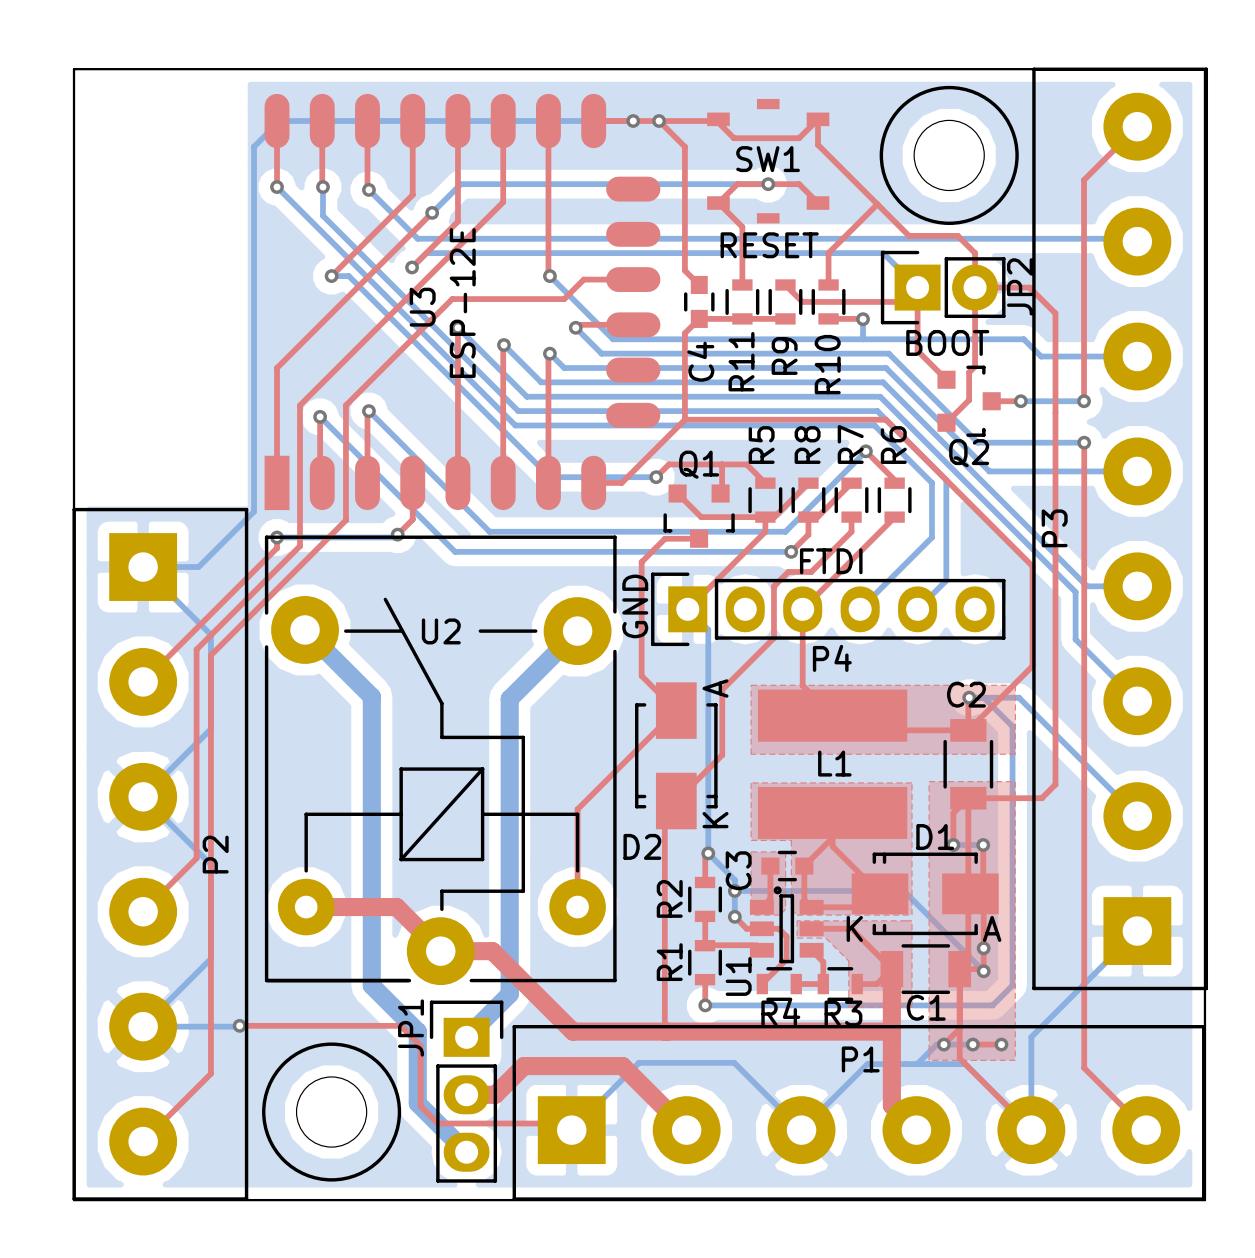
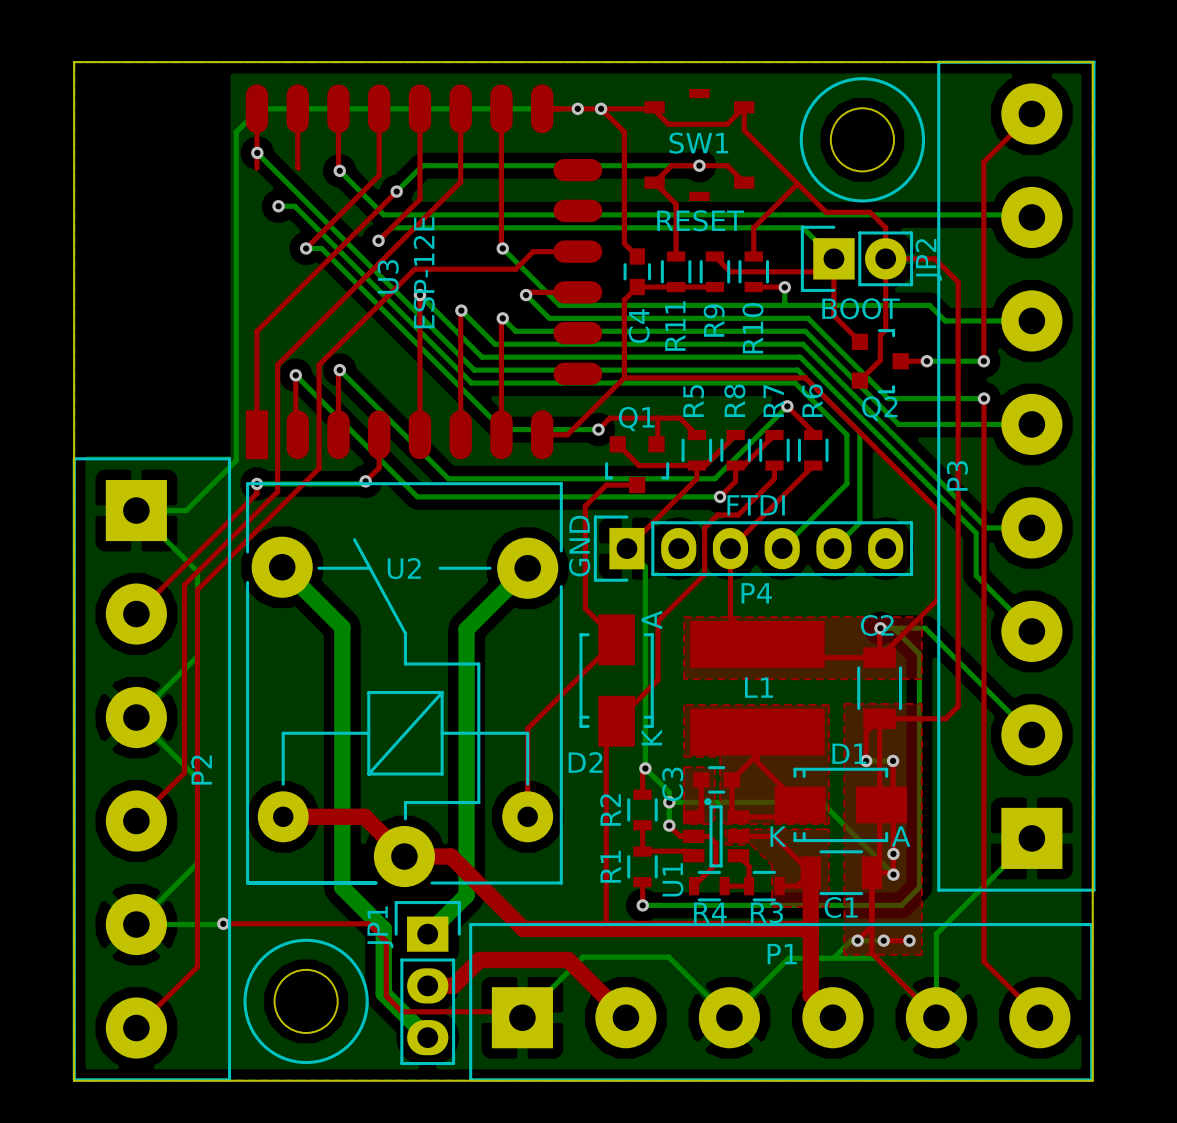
bottom track: (277, 187) (515, 425) -> (278, 206) (294, 206) (471, 383)
via position: (277, 187) -> (257, 152)
bottom track: (322, 187) (322, 215) -> (257, 153) (298, 194)
via: (322, 187) -> none
via: none -> (278, 206)

